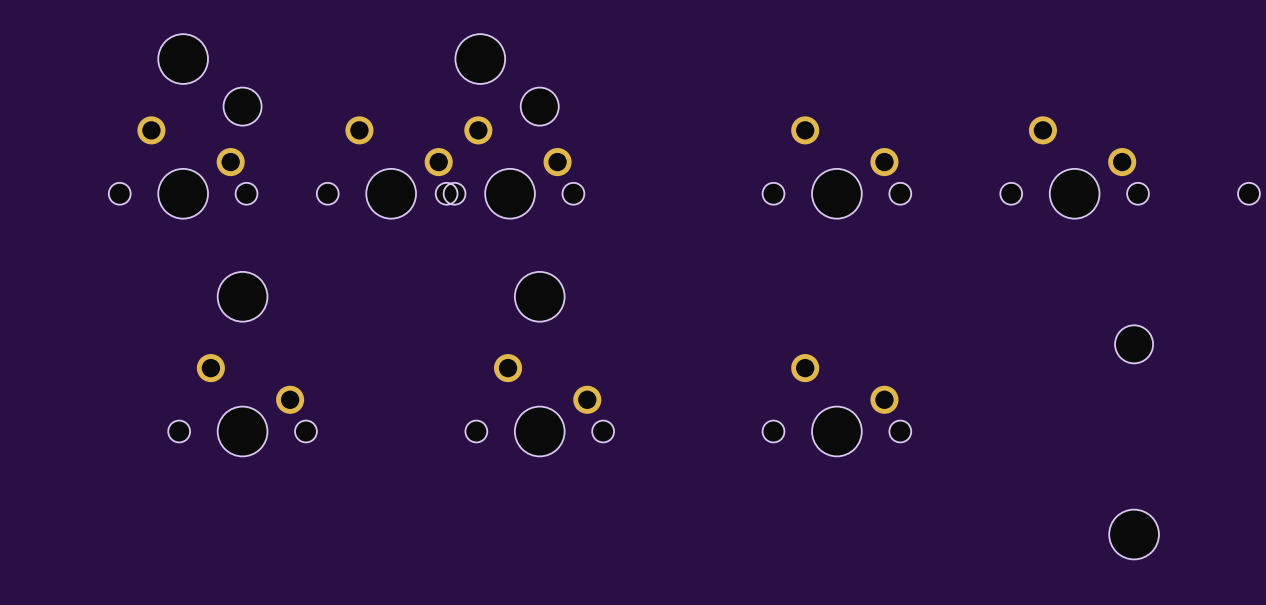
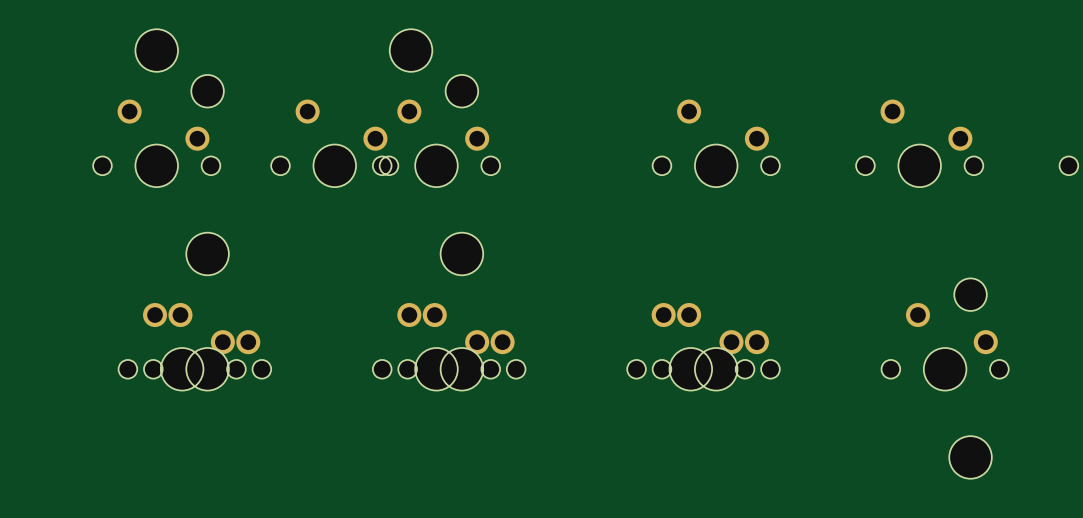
part: none -> (182, 346)
part: none -> (436, 346)
part: none -> (690, 346)
part: none -> (945, 346)

